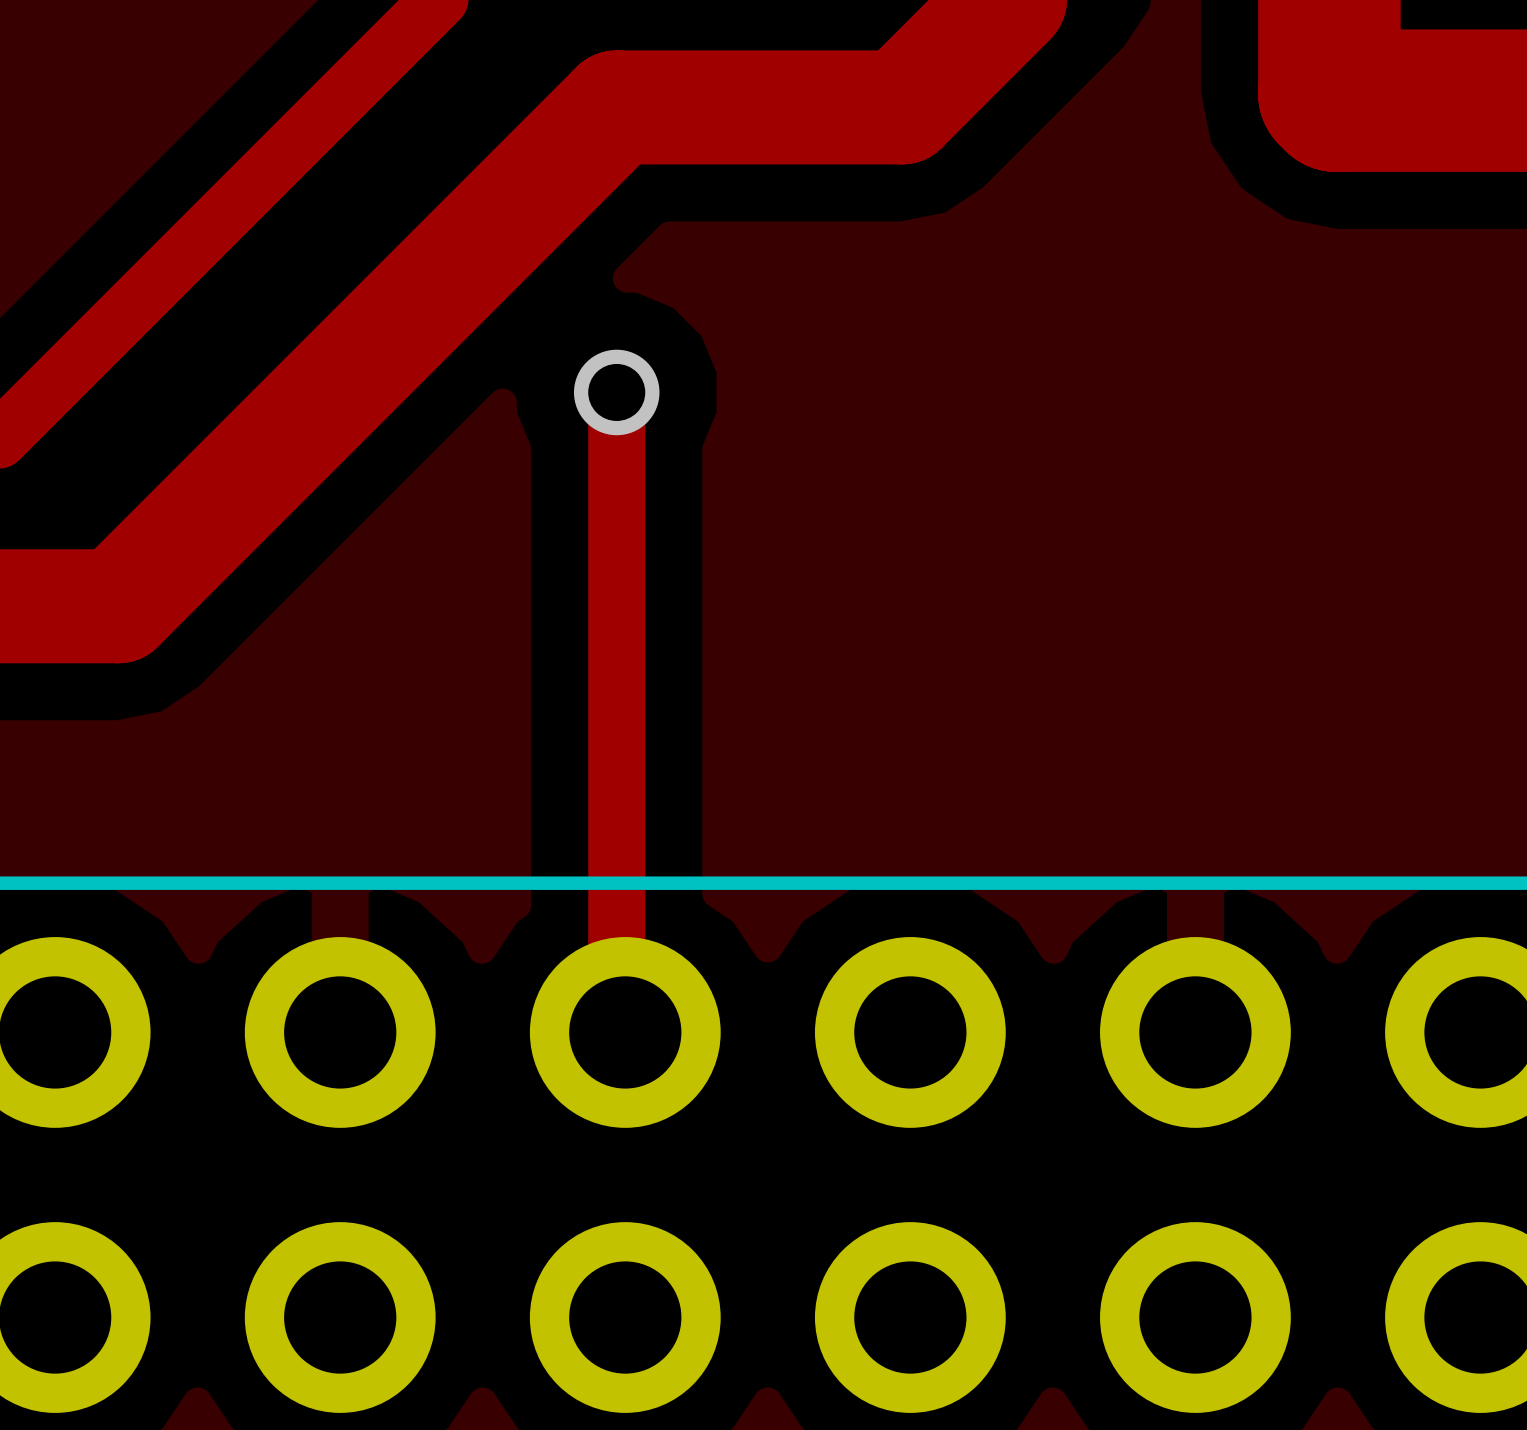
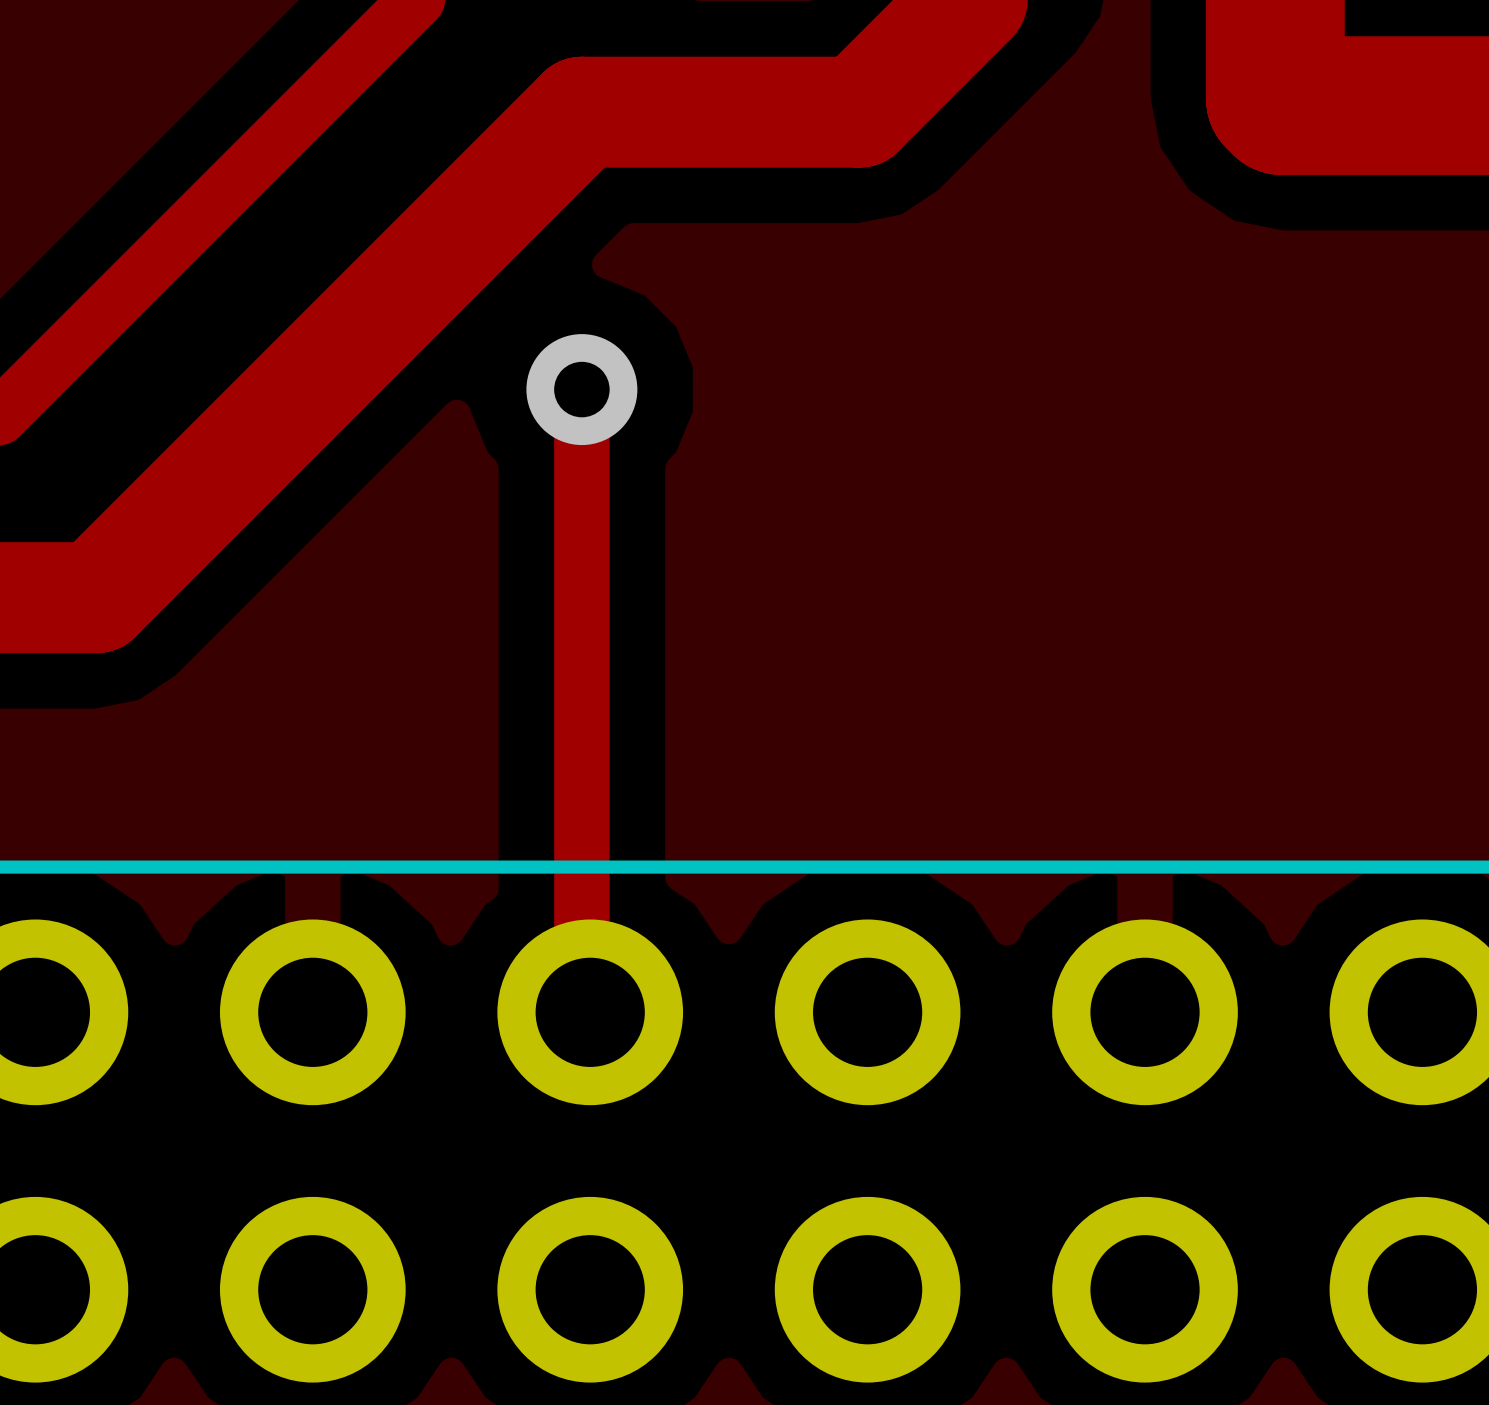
via size: [573, 349, 660, 436] -> [526, 334, 638, 446]

